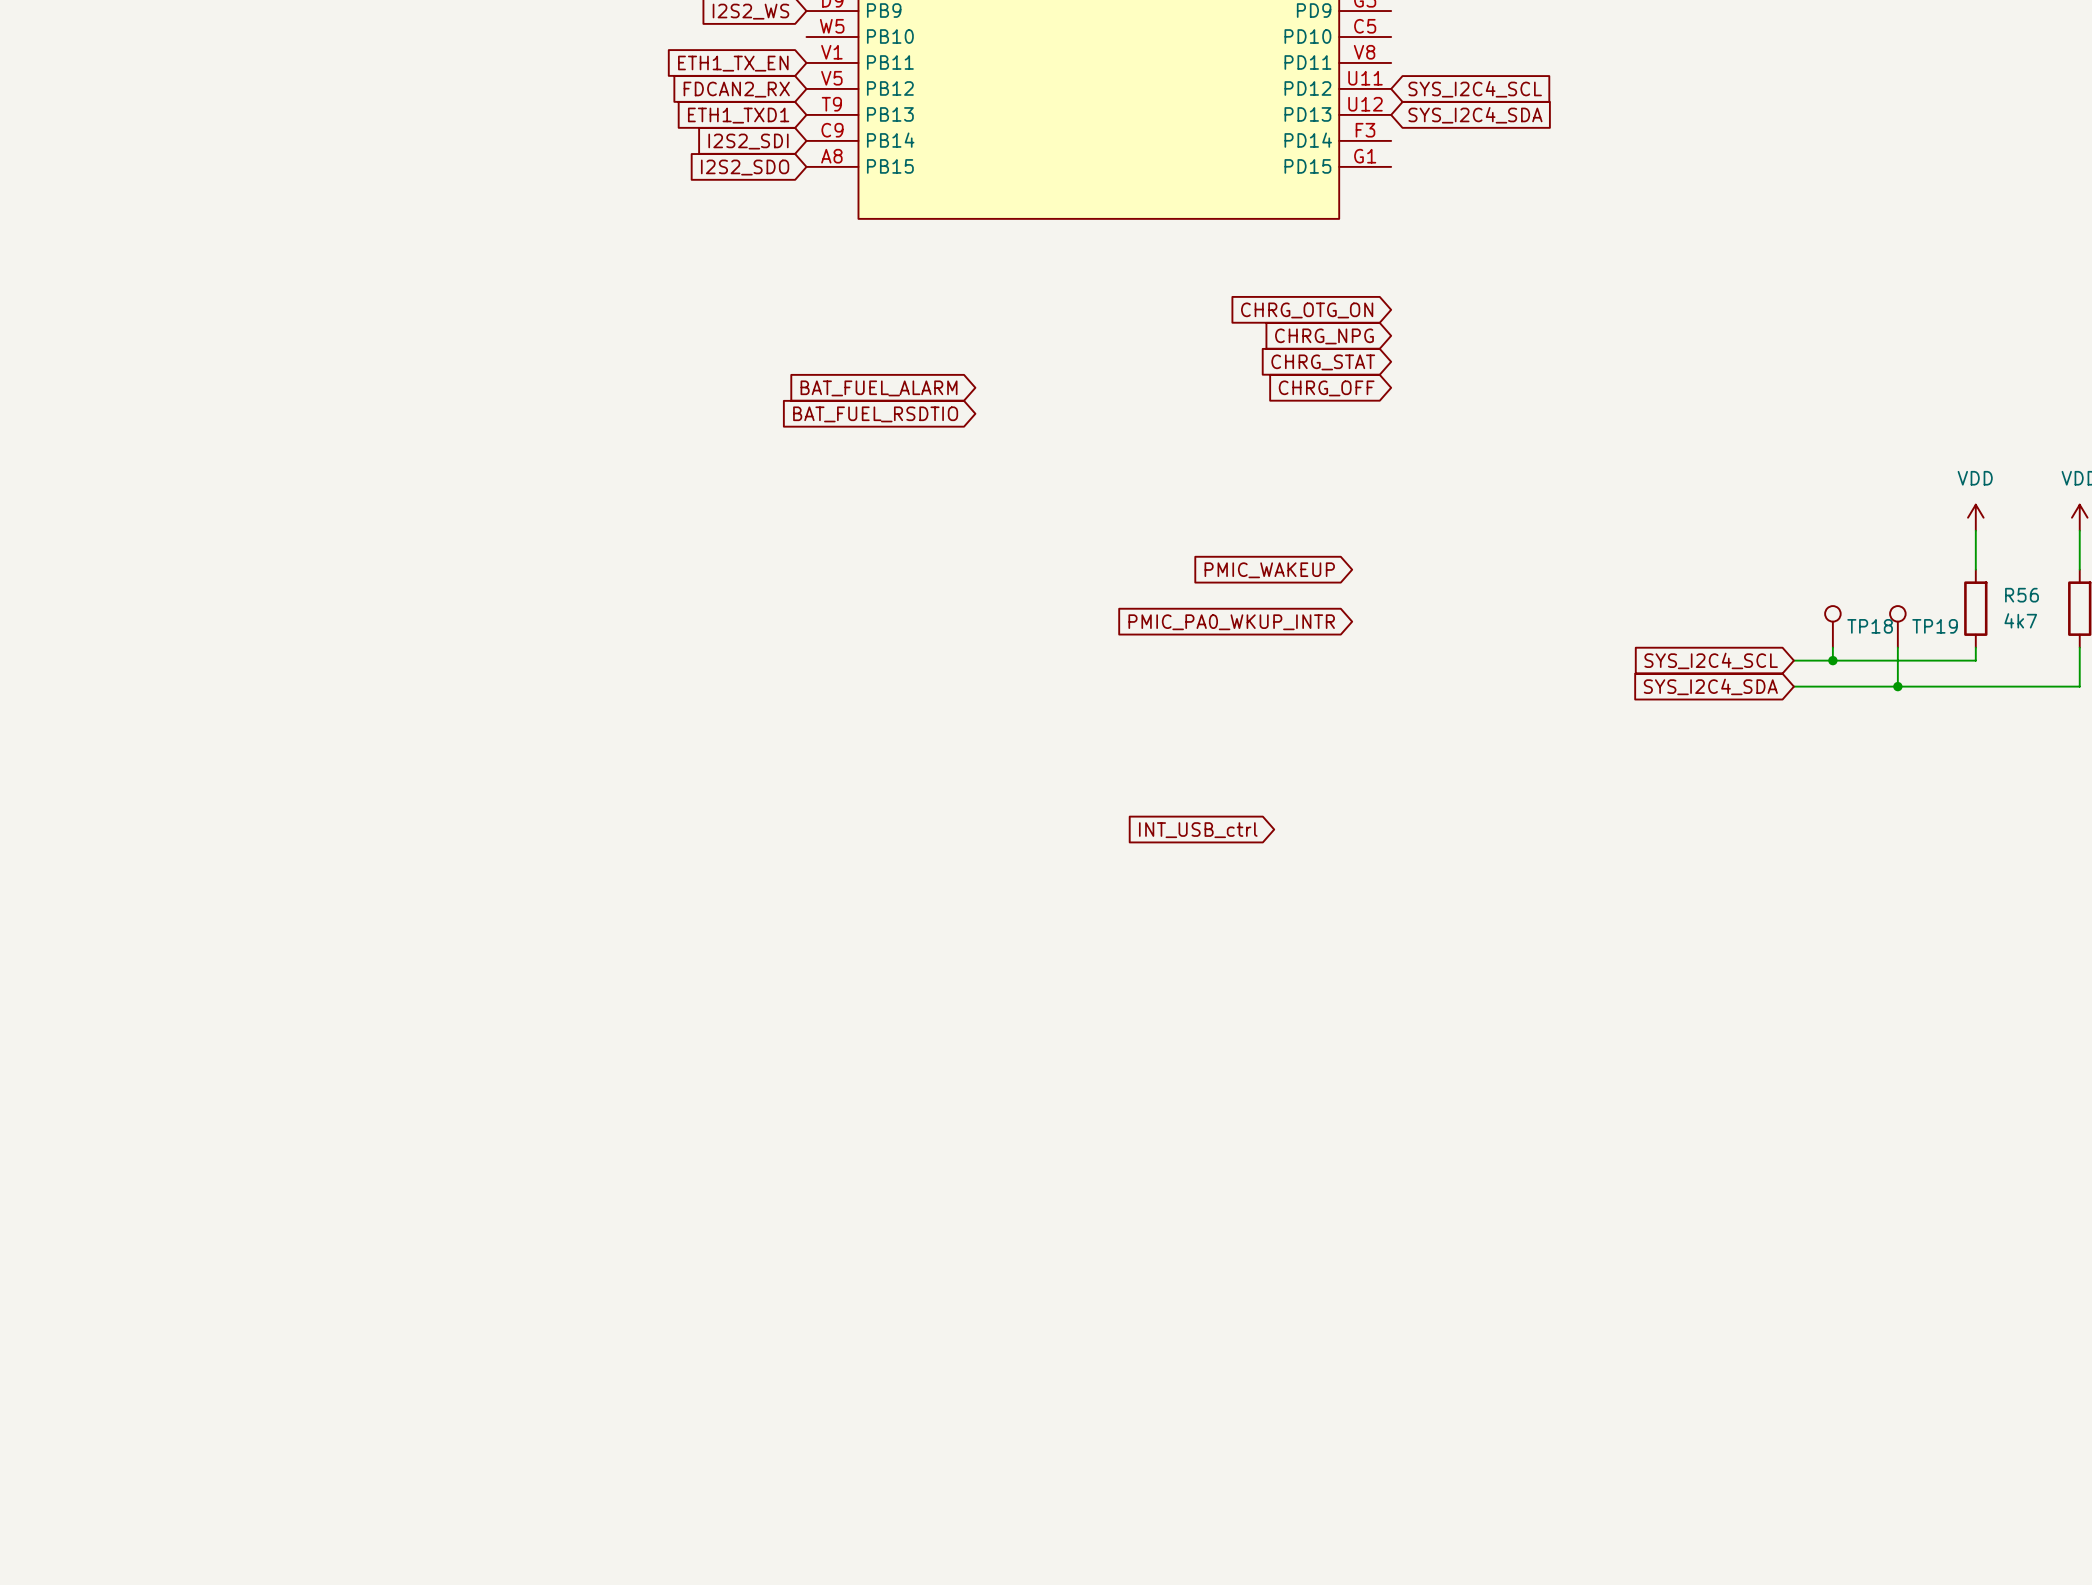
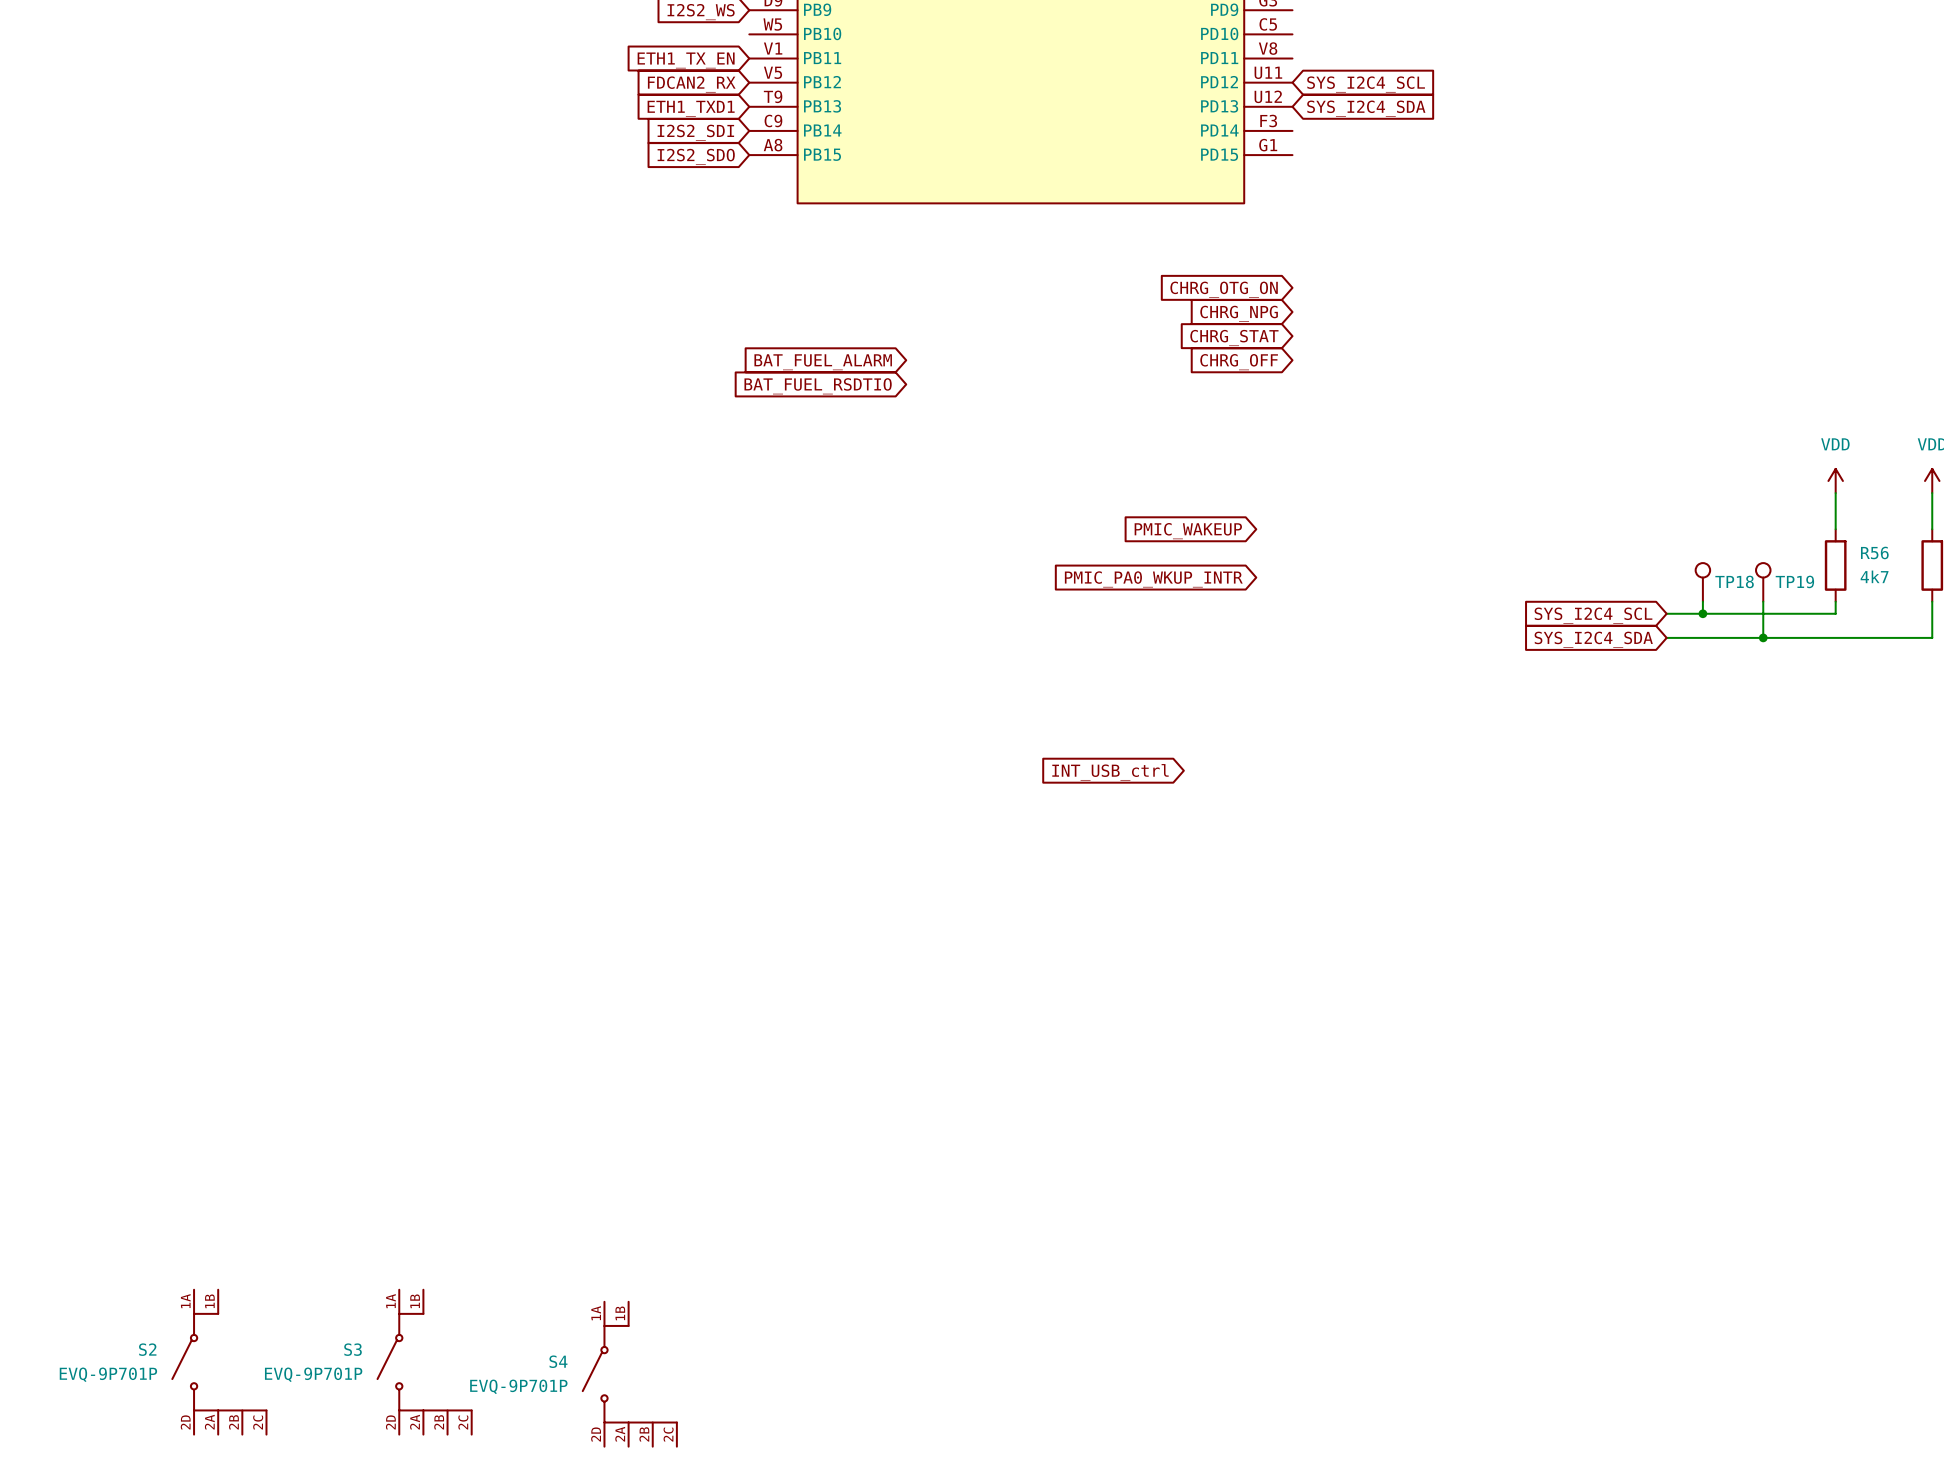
S2: none -> EVQ-9P701P (219, 1362)
S3: none -> EVQ-9P701P (424, 1362)
S4: none -> EVQ-9P701P (629, 1374)

